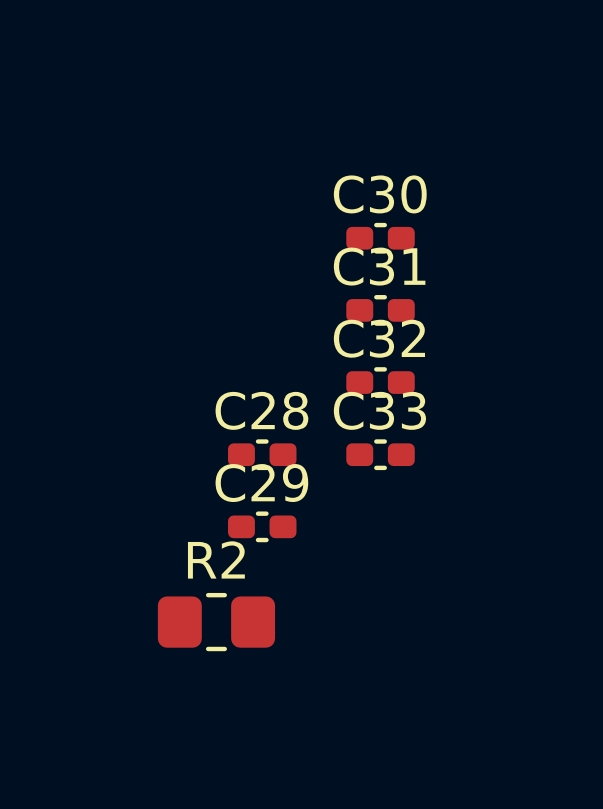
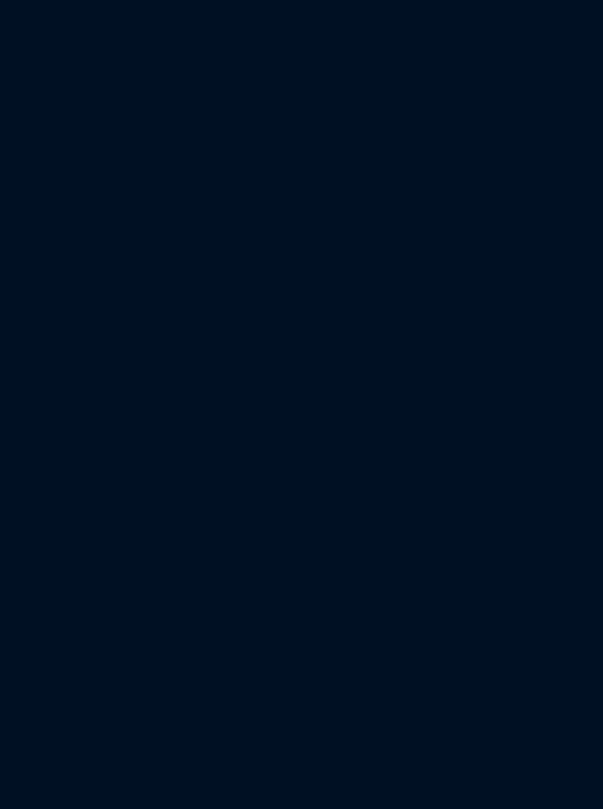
C30: (380, 238) -> none
C31: (380, 310) -> none
C32: (380, 382) -> none
C28: (262, 454) -> none
C33: (380, 454) -> none
C29: (262, 526) -> none
R2: (216, 622) -> none

